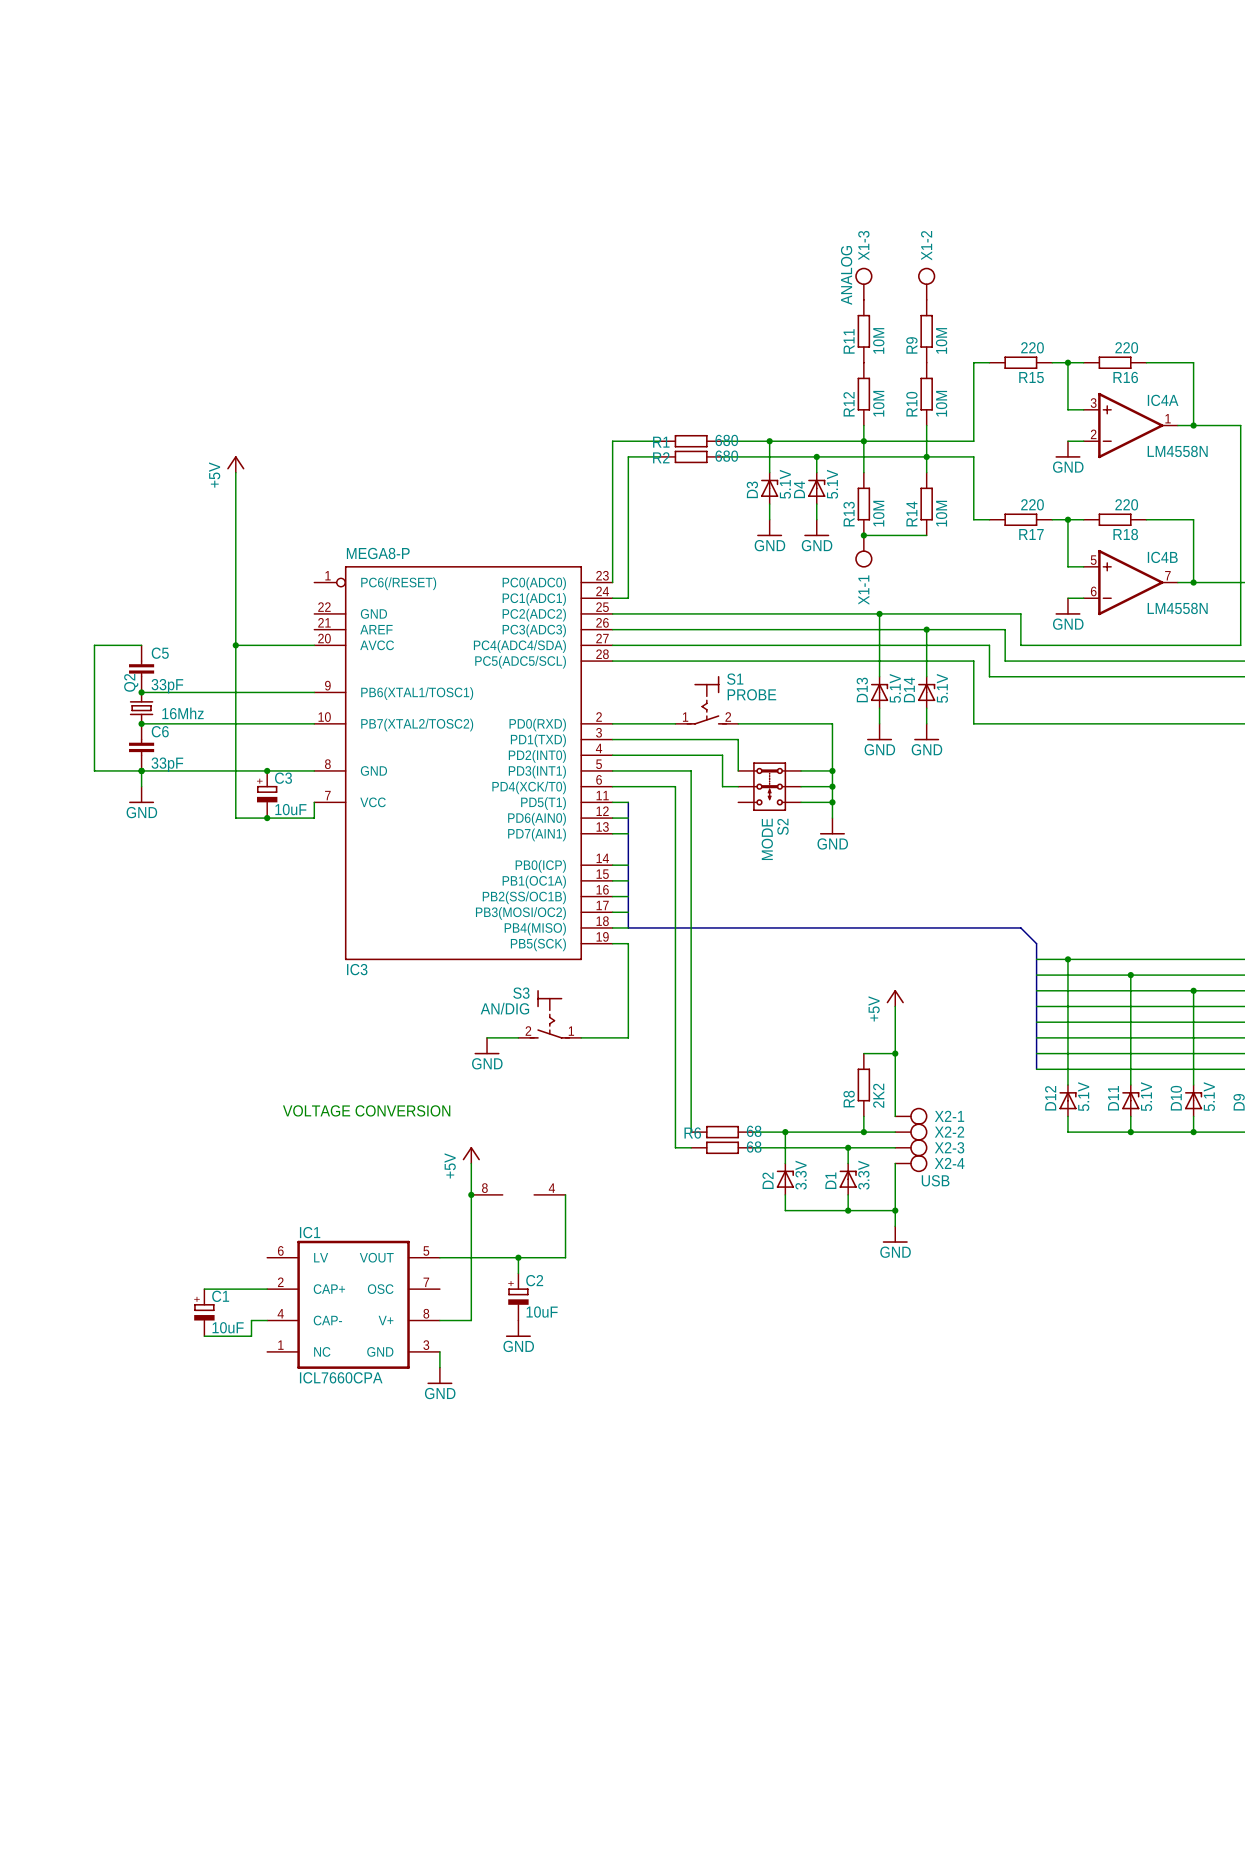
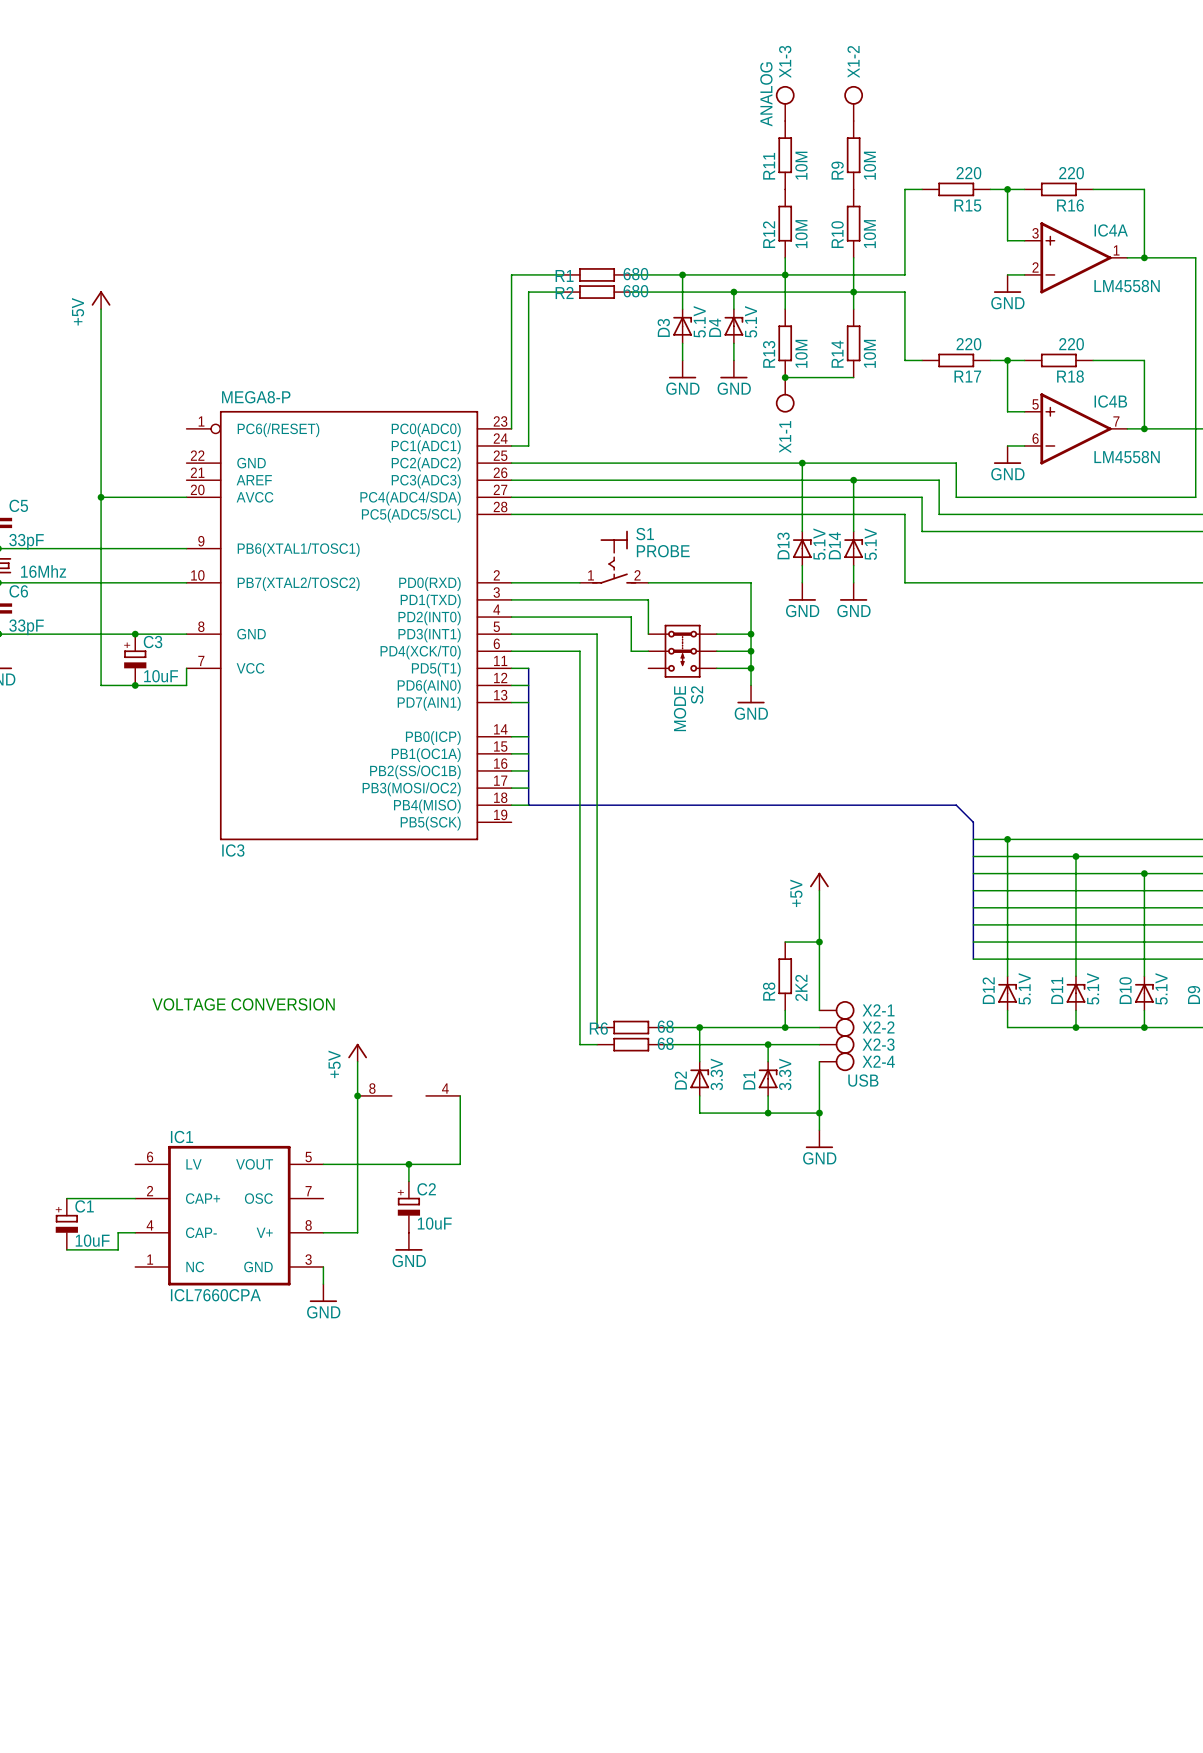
wire: (612, 943) (628, 943) (628, 1037) (581, 1037) -> none
S3: AN/DIG (549, 1014) -> none
wire: (487, 1037) (518, 1037) -> none
power symbol: GND (487, 1046) -> none

